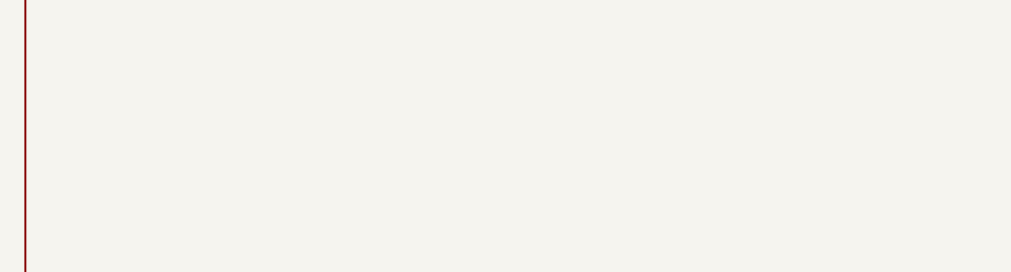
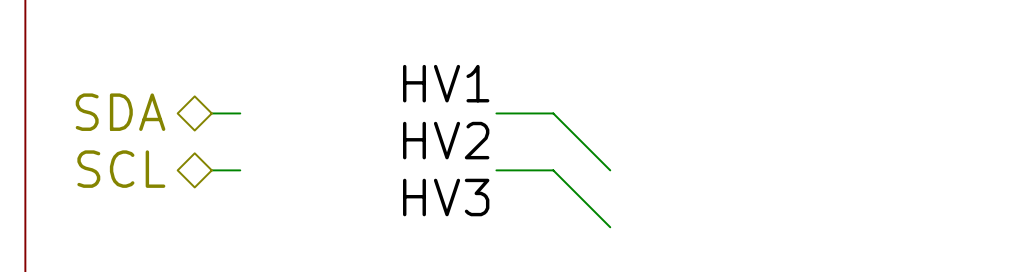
label: none -> HV1 (446, 83)
hierarchical label: none -> SDA (120, 112)
wire: none -> (211, 113) (240, 113)
wire: none -> (496, 113) (553, 113) (610, 170)
label: none -> HV2 (446, 140)
hierarchical label: none -> SCL (121, 169)
wire: none -> (211, 170) (240, 170)
wire: none -> (496, 170) (553, 170) (610, 227)
label: none -> HV3 (446, 197)

